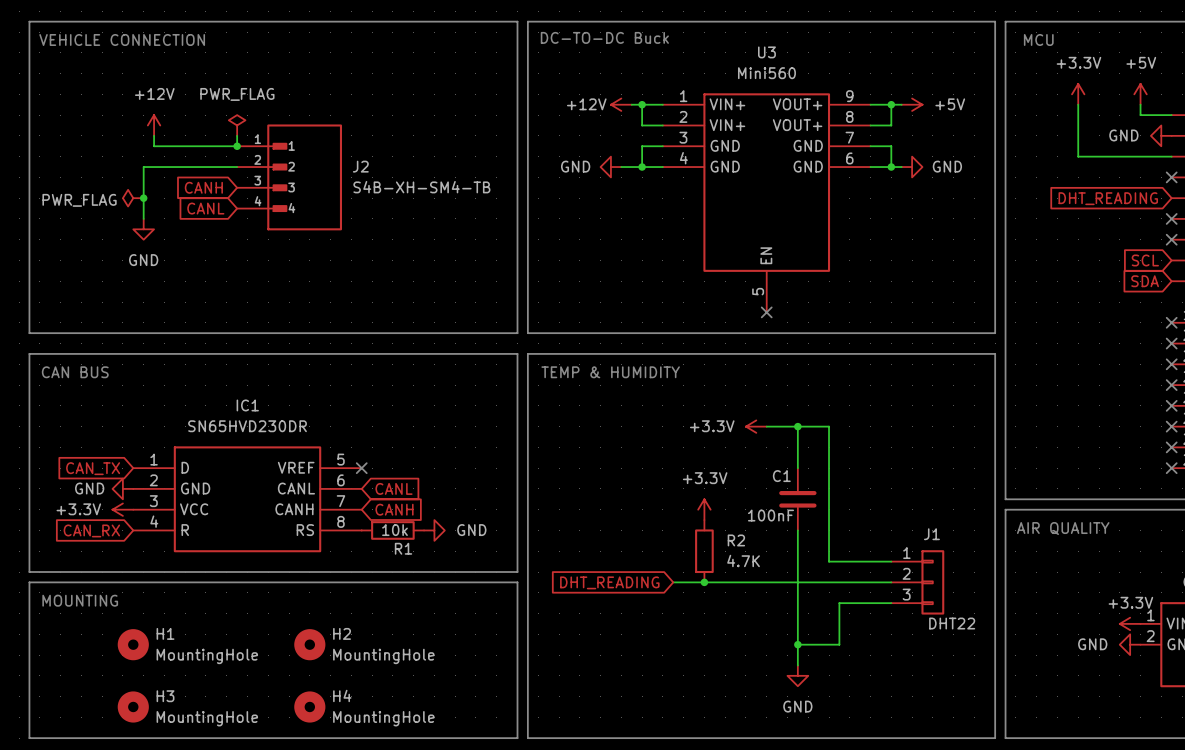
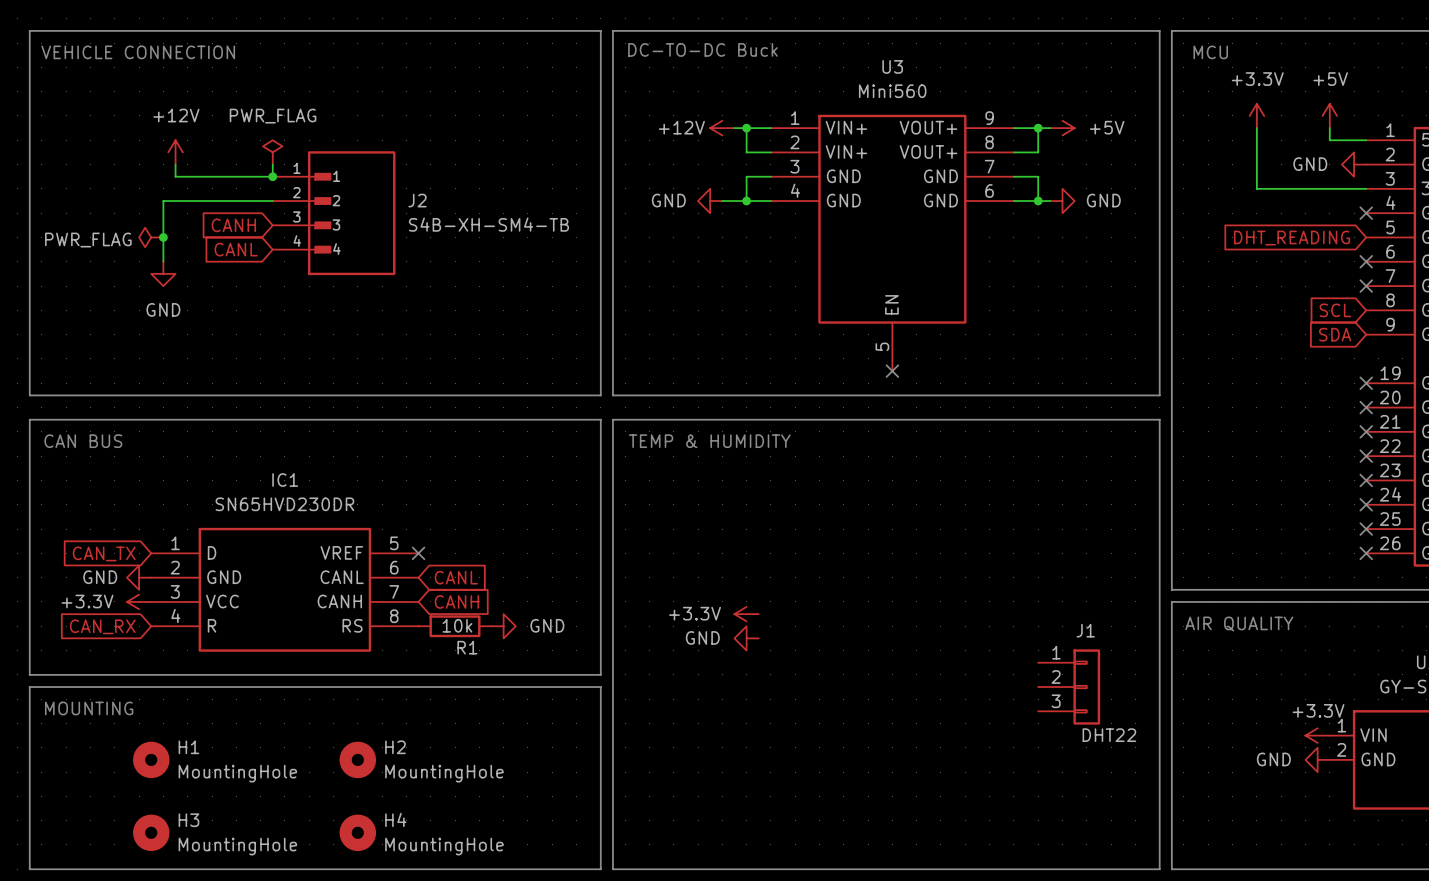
power symbol: +3.3V (756, 426) -> none
wire: (766, 426) (829, 426) (829, 561) (891, 561) -> none
wire: (797, 426) (797, 468) -> none
junction: (797, 426) -> none
power symbol text position: +3.3V (705, 478) -> +3.3V (695, 613)
C1: 100nF (797, 499) -> none
power symbol rotation: 0° (704, 509) -> 90° counterclockwise (746, 614)
power symbol position: +3.3V (704, 509) -> +3.3V (746, 614)
wire: (797, 530) (797, 665) -> none
power symbol: none -> GND (746, 638)
R2: 4.7K (704, 551) -> none
global label: DHT_READING (609, 582) -> none
wire: (673, 582) (891, 582) -> none
junction: (704, 582) -> none
wire: (891, 603) (839, 603) (839, 644) (797, 644) -> none
junction: (797, 644) -> none
power symbol: GND (797, 675) -> none

